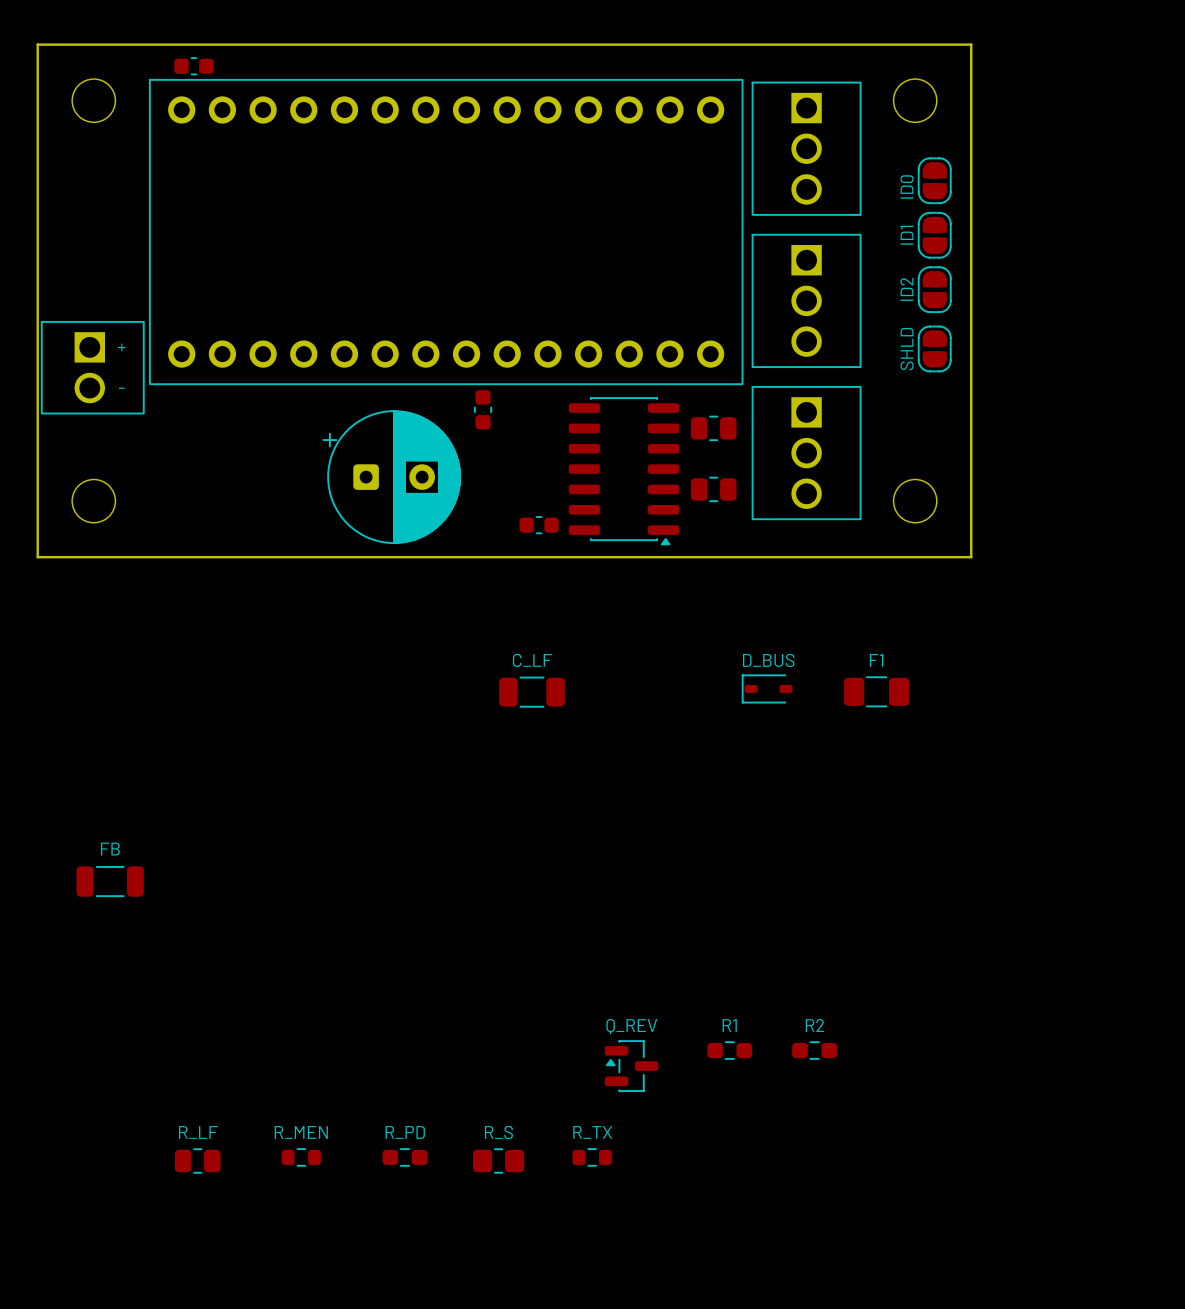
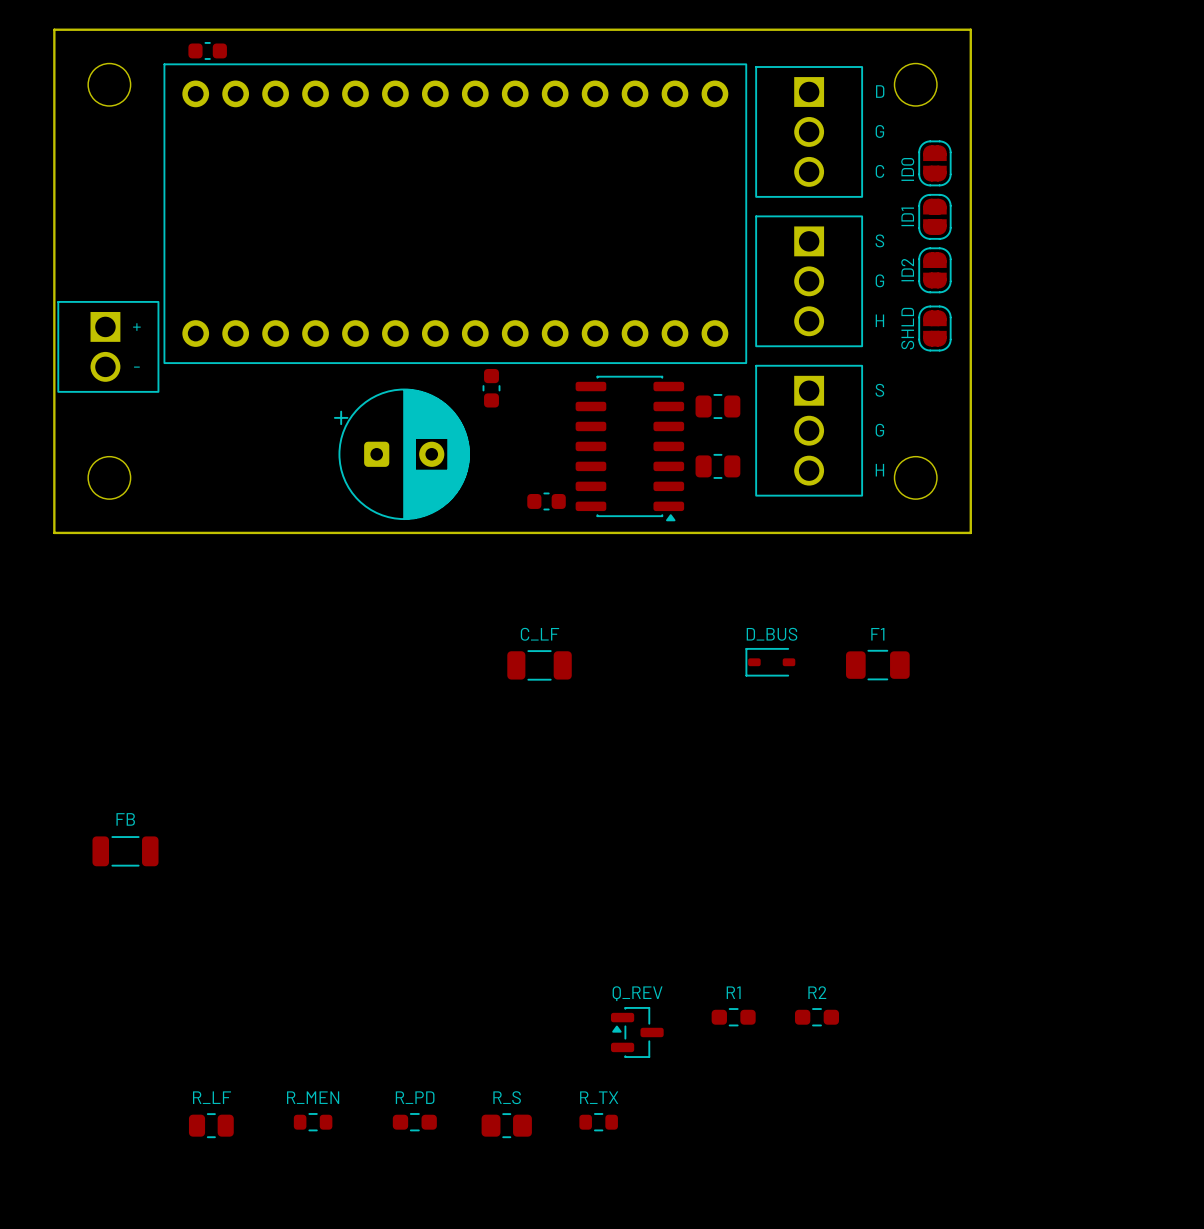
text: none -> D (880, 91)
text: none -> G (879, 131)
text: none -> C (879, 171)
text: none -> S (879, 240)
text: none -> G (879, 280)
text: none -> H (879, 320)
text: none -> S (879, 390)
text: none -> G (879, 430)
text: none -> H (879, 470)

